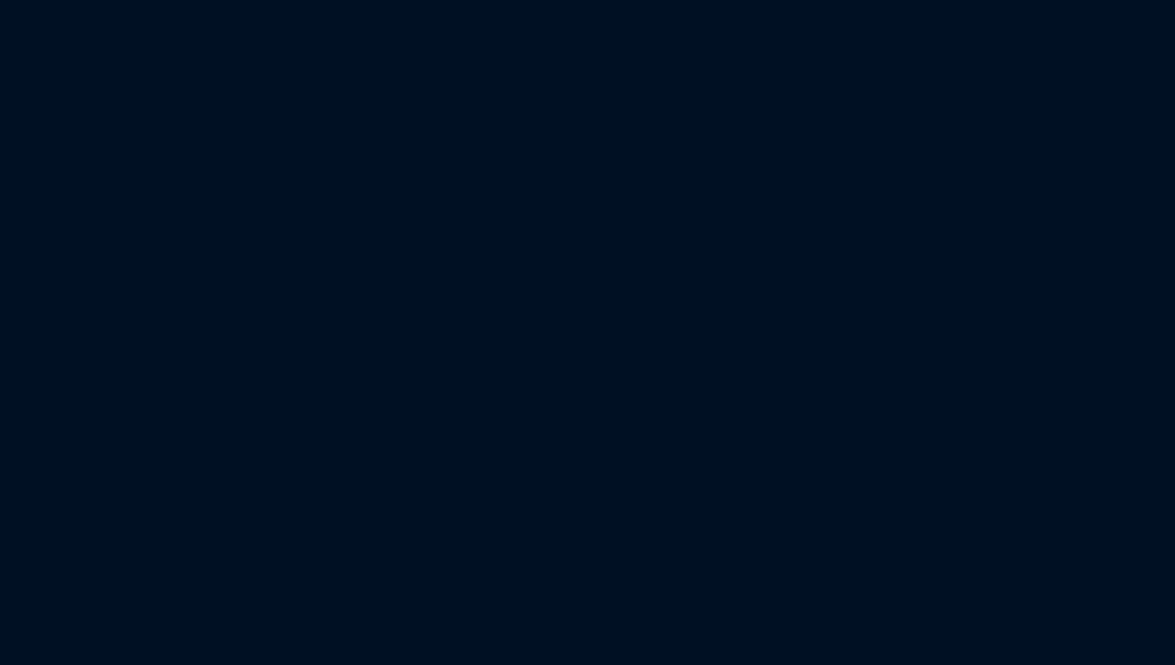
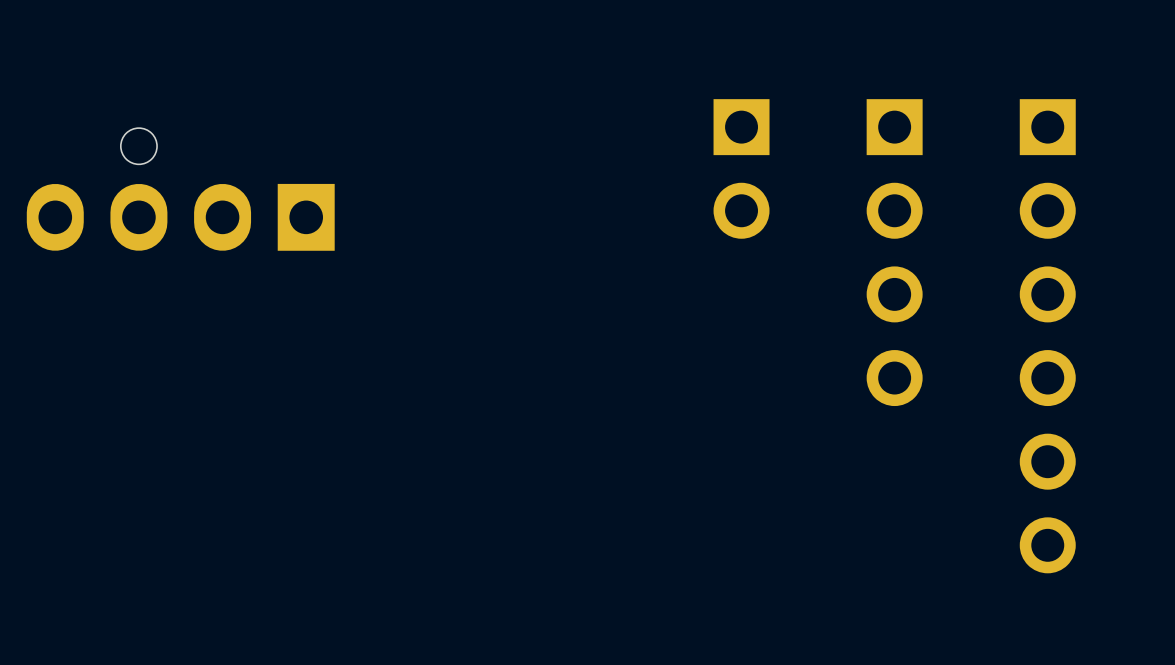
part: none -> (741, 168)
part: none -> (180, 189)
part: none -> (894, 252)
part: none -> (1047, 336)

